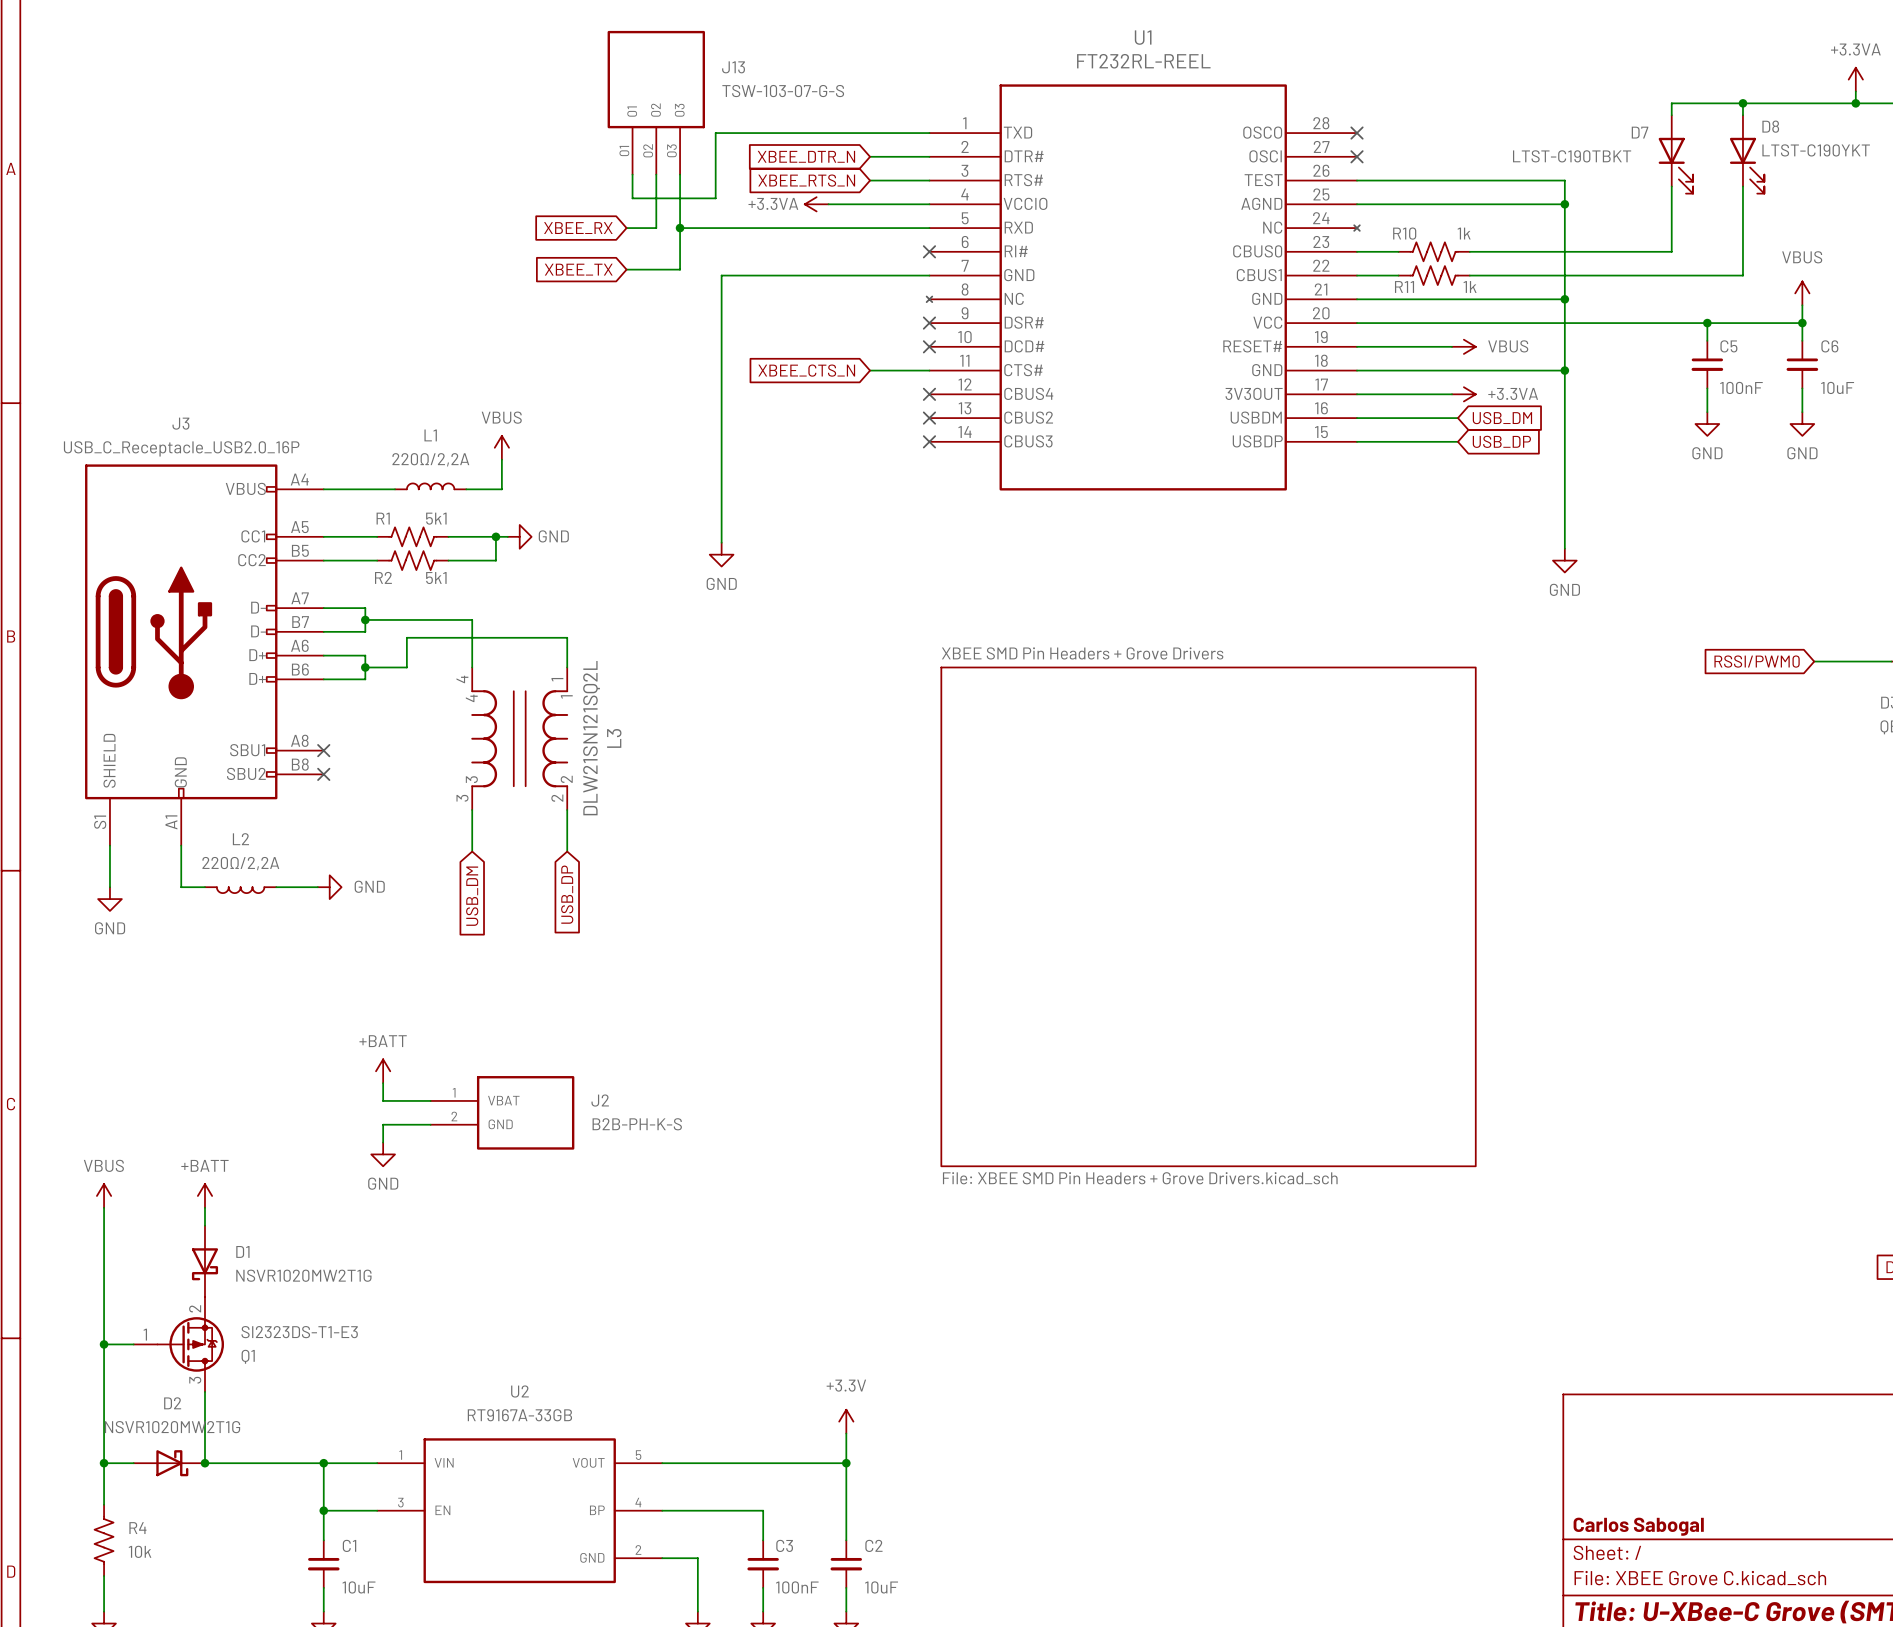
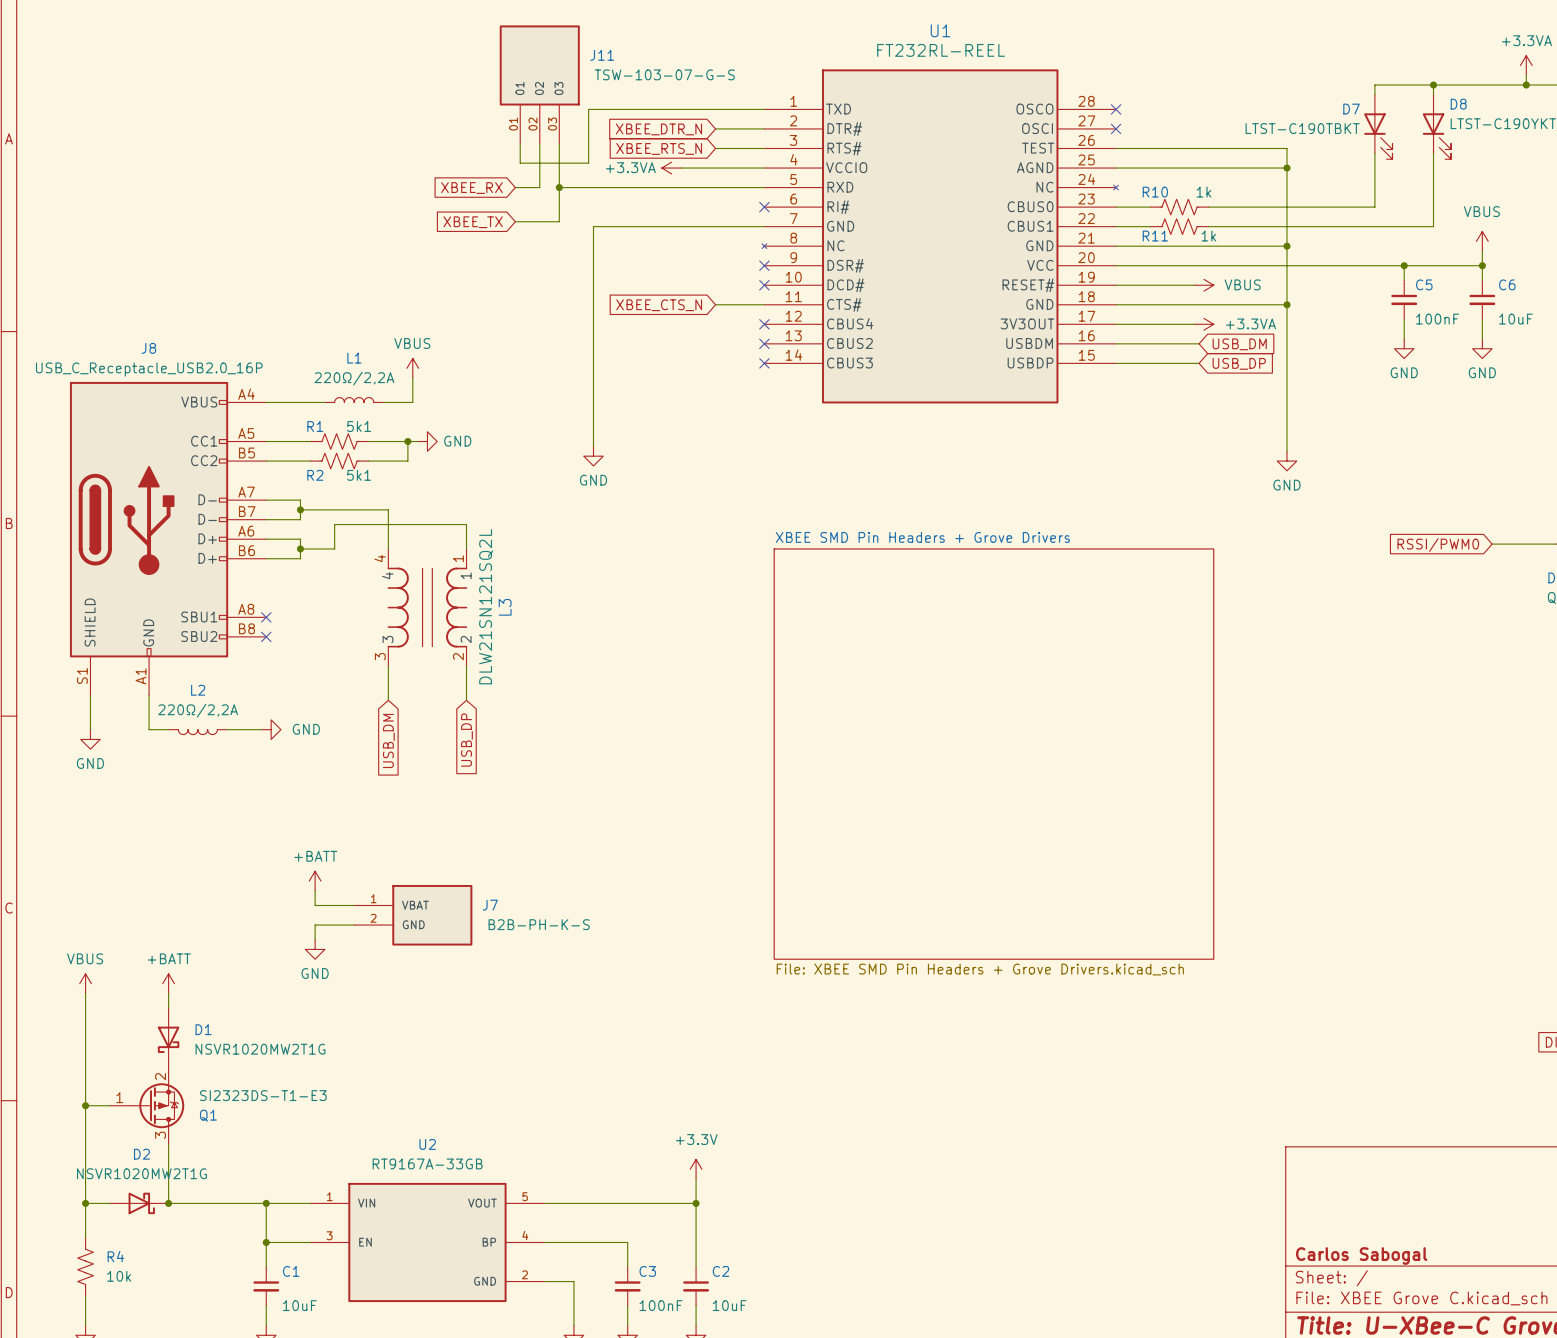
J13 name: J13 (733, 67) -> J11 (602, 55)
J3 name: J3 (180, 423) -> J8 (148, 348)
J2 name: J2 (600, 1100) -> J7 (490, 905)

